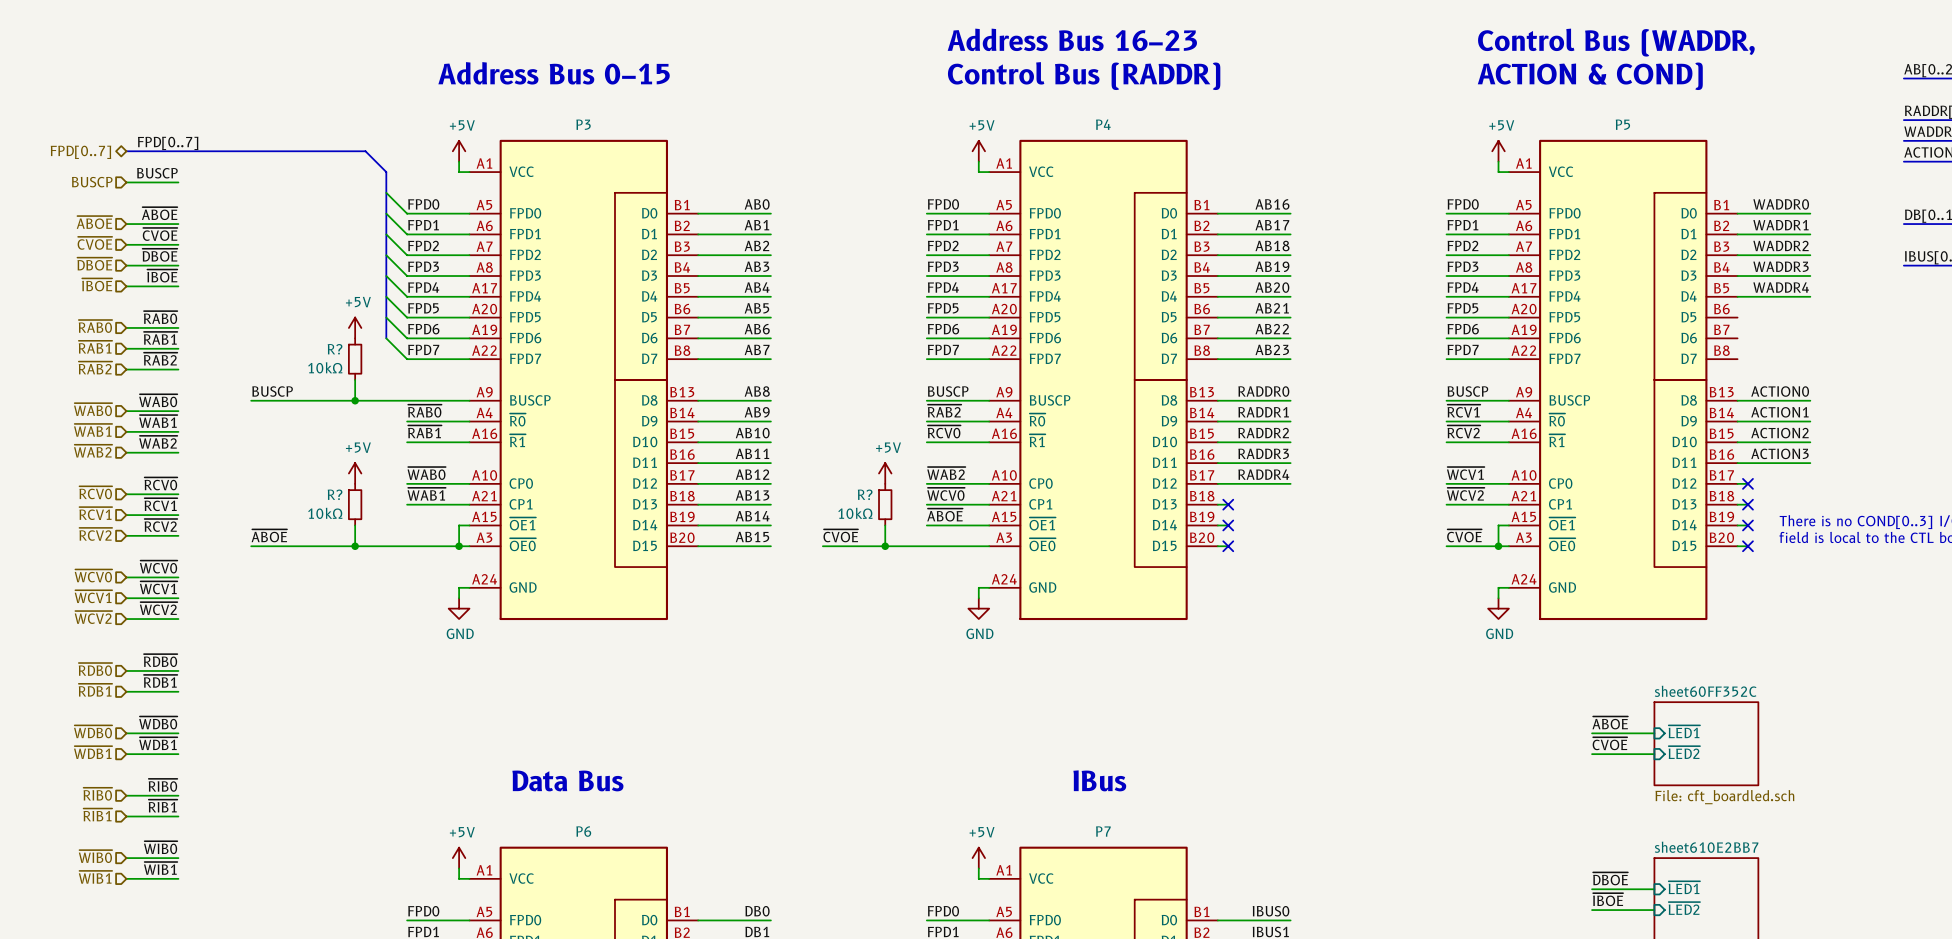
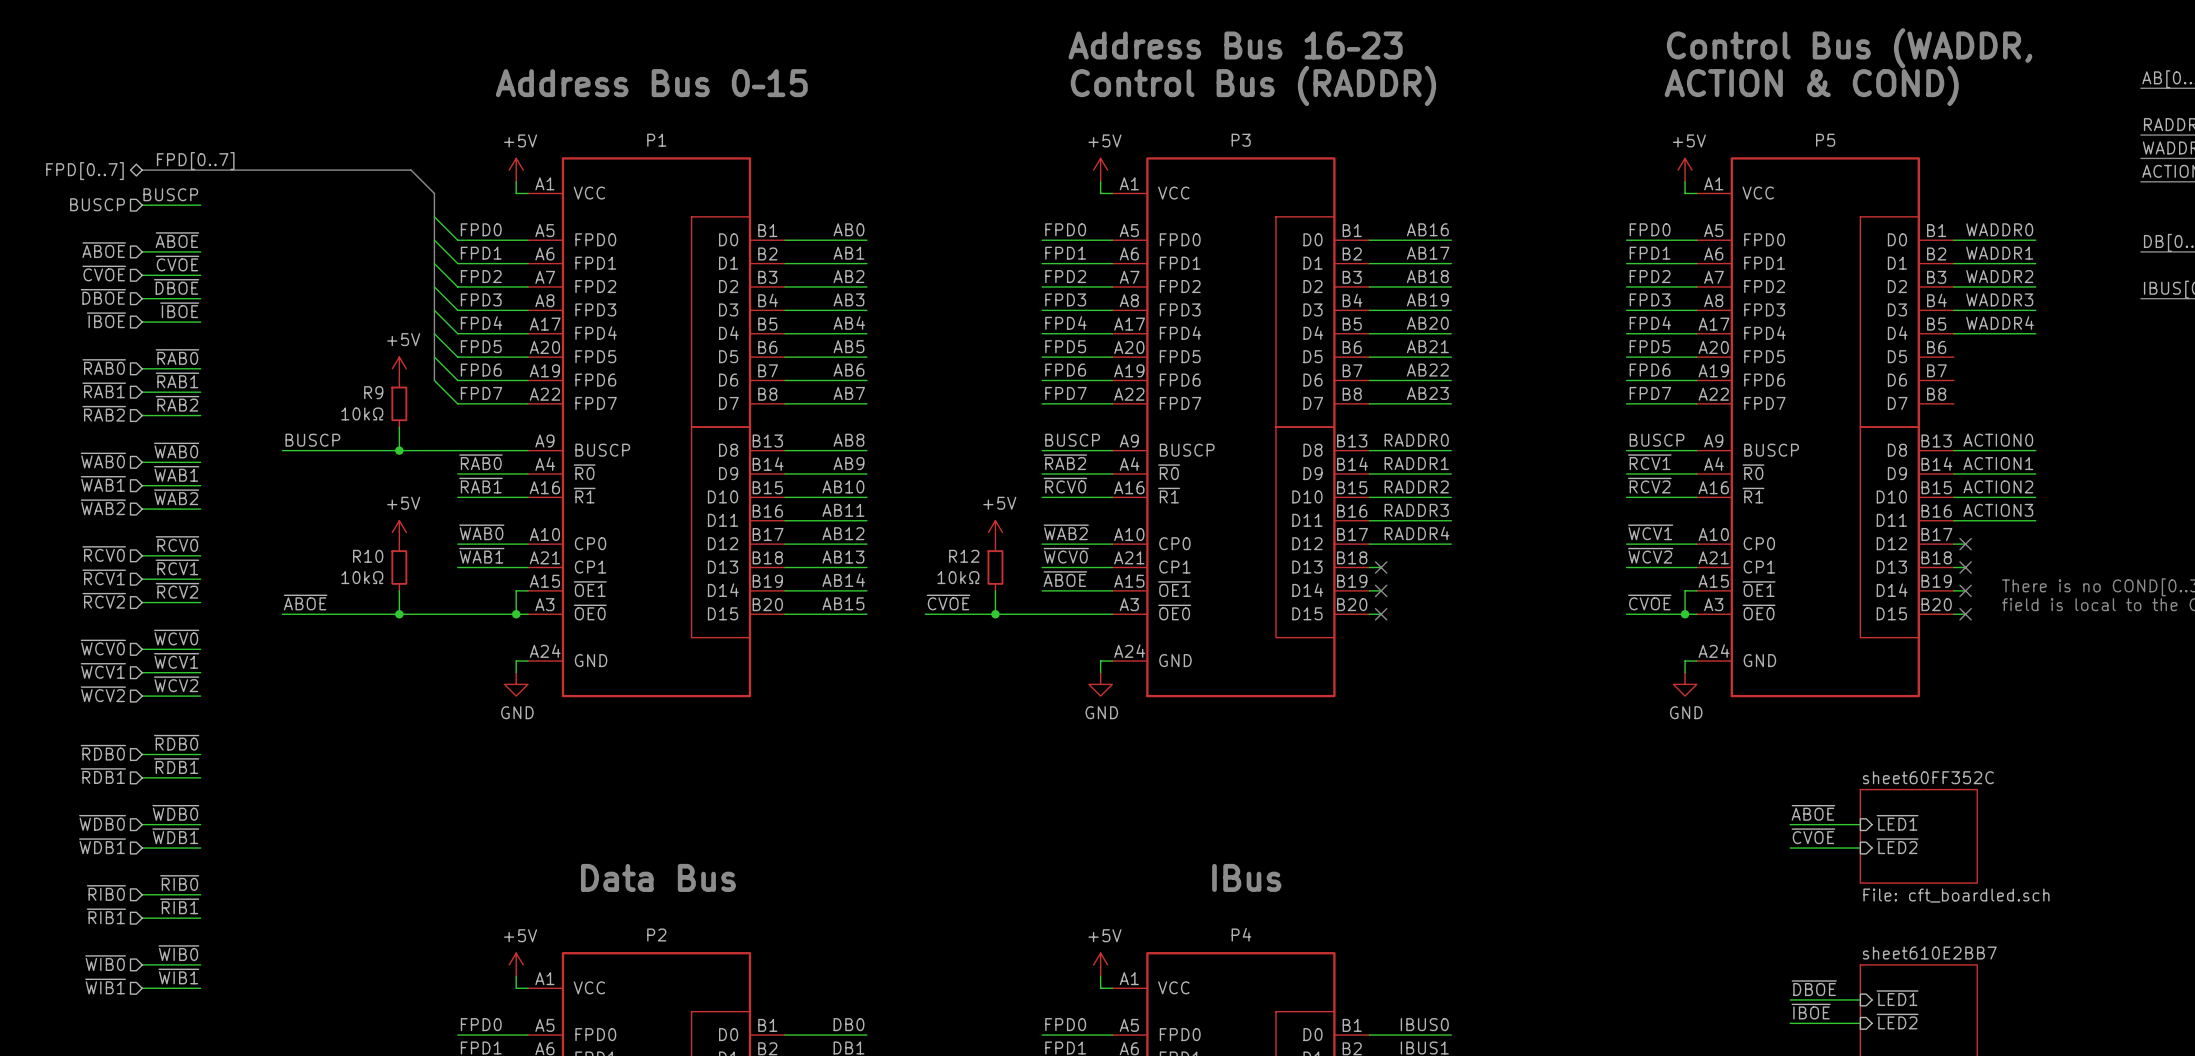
P3 name: P3 (583, 124) -> P1 (656, 140)
P4 name: P4 (1103, 124) -> P3 (1241, 140)
R? name: R? (335, 349) -> R9 (373, 392)
R? name: R? (335, 494) -> R10 (368, 556)
R? name: R? (865, 494) -> R12 (964, 556)
P6 name: P6 (583, 831) -> P2 (656, 935)
P7 name: P7 (1103, 831) -> P4 (1241, 934)

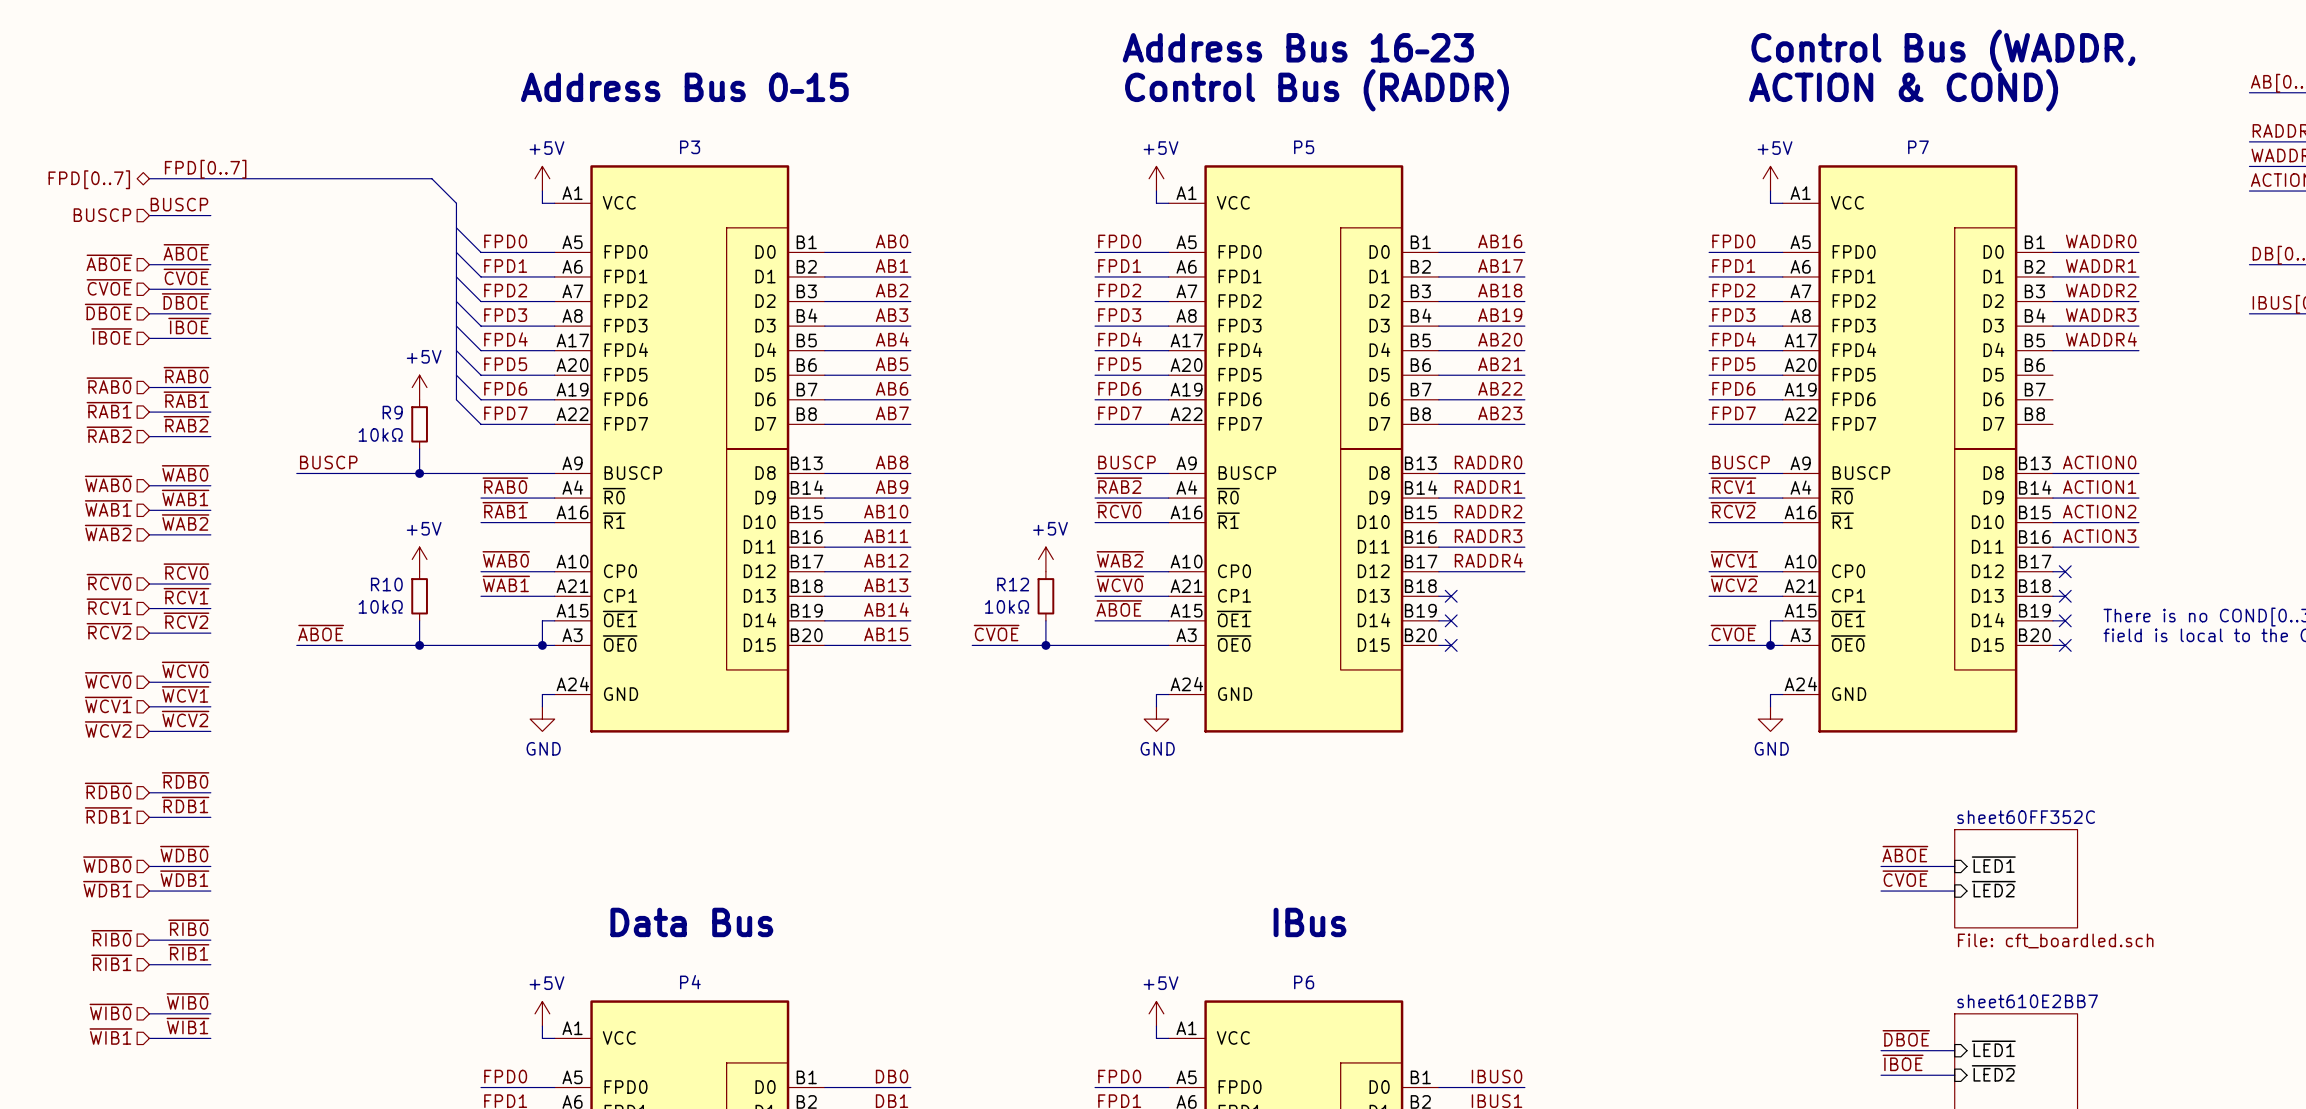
P1 name: P1 (656, 140) -> P3 (690, 147)
P3 name: P3 (1241, 140) -> P5 (1304, 147)
P5 name: P5 (1825, 140) -> P7 (1918, 147)
P4 name: P4 (1241, 934) -> P6 (1304, 982)
P2 name: P2 (656, 935) -> P4 (690, 982)

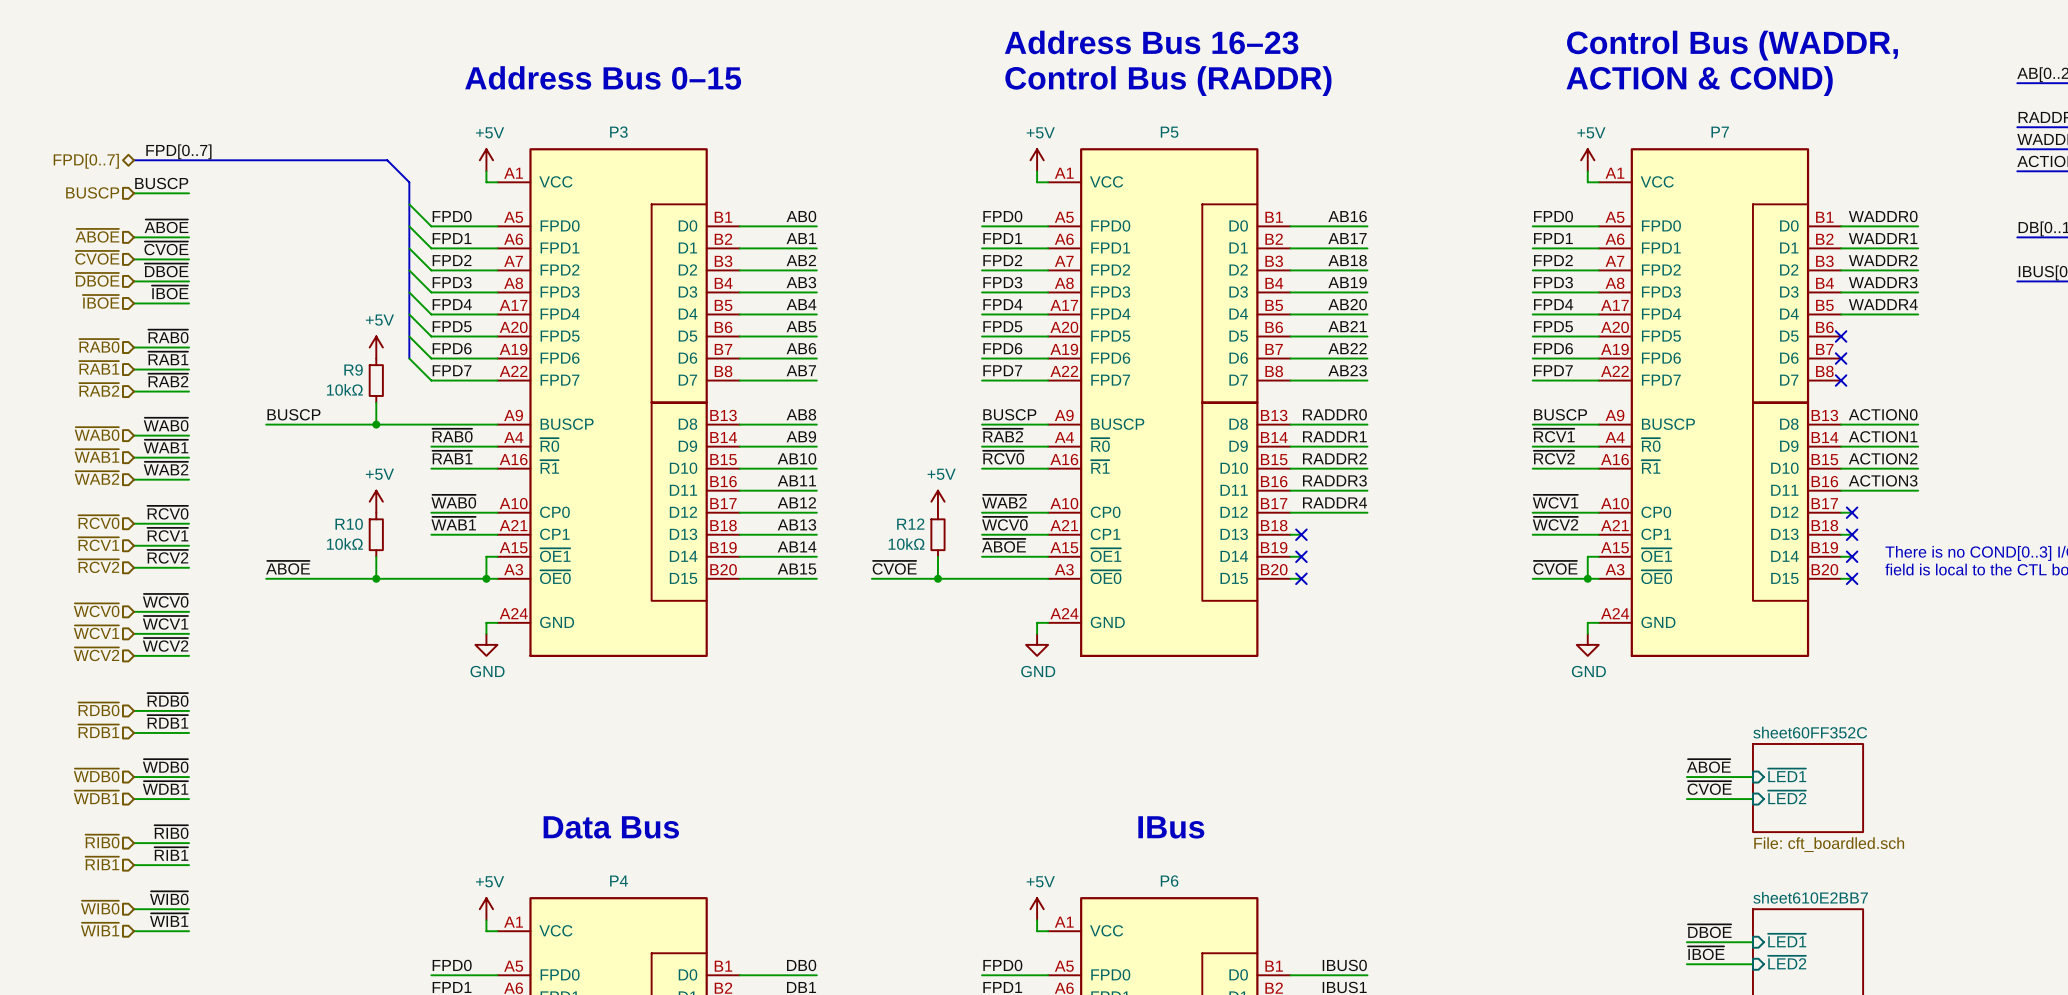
no-connect mark: none -> (1841, 336)
no-connect mark: none -> (1841, 358)
no-connect mark: none -> (1841, 380)

